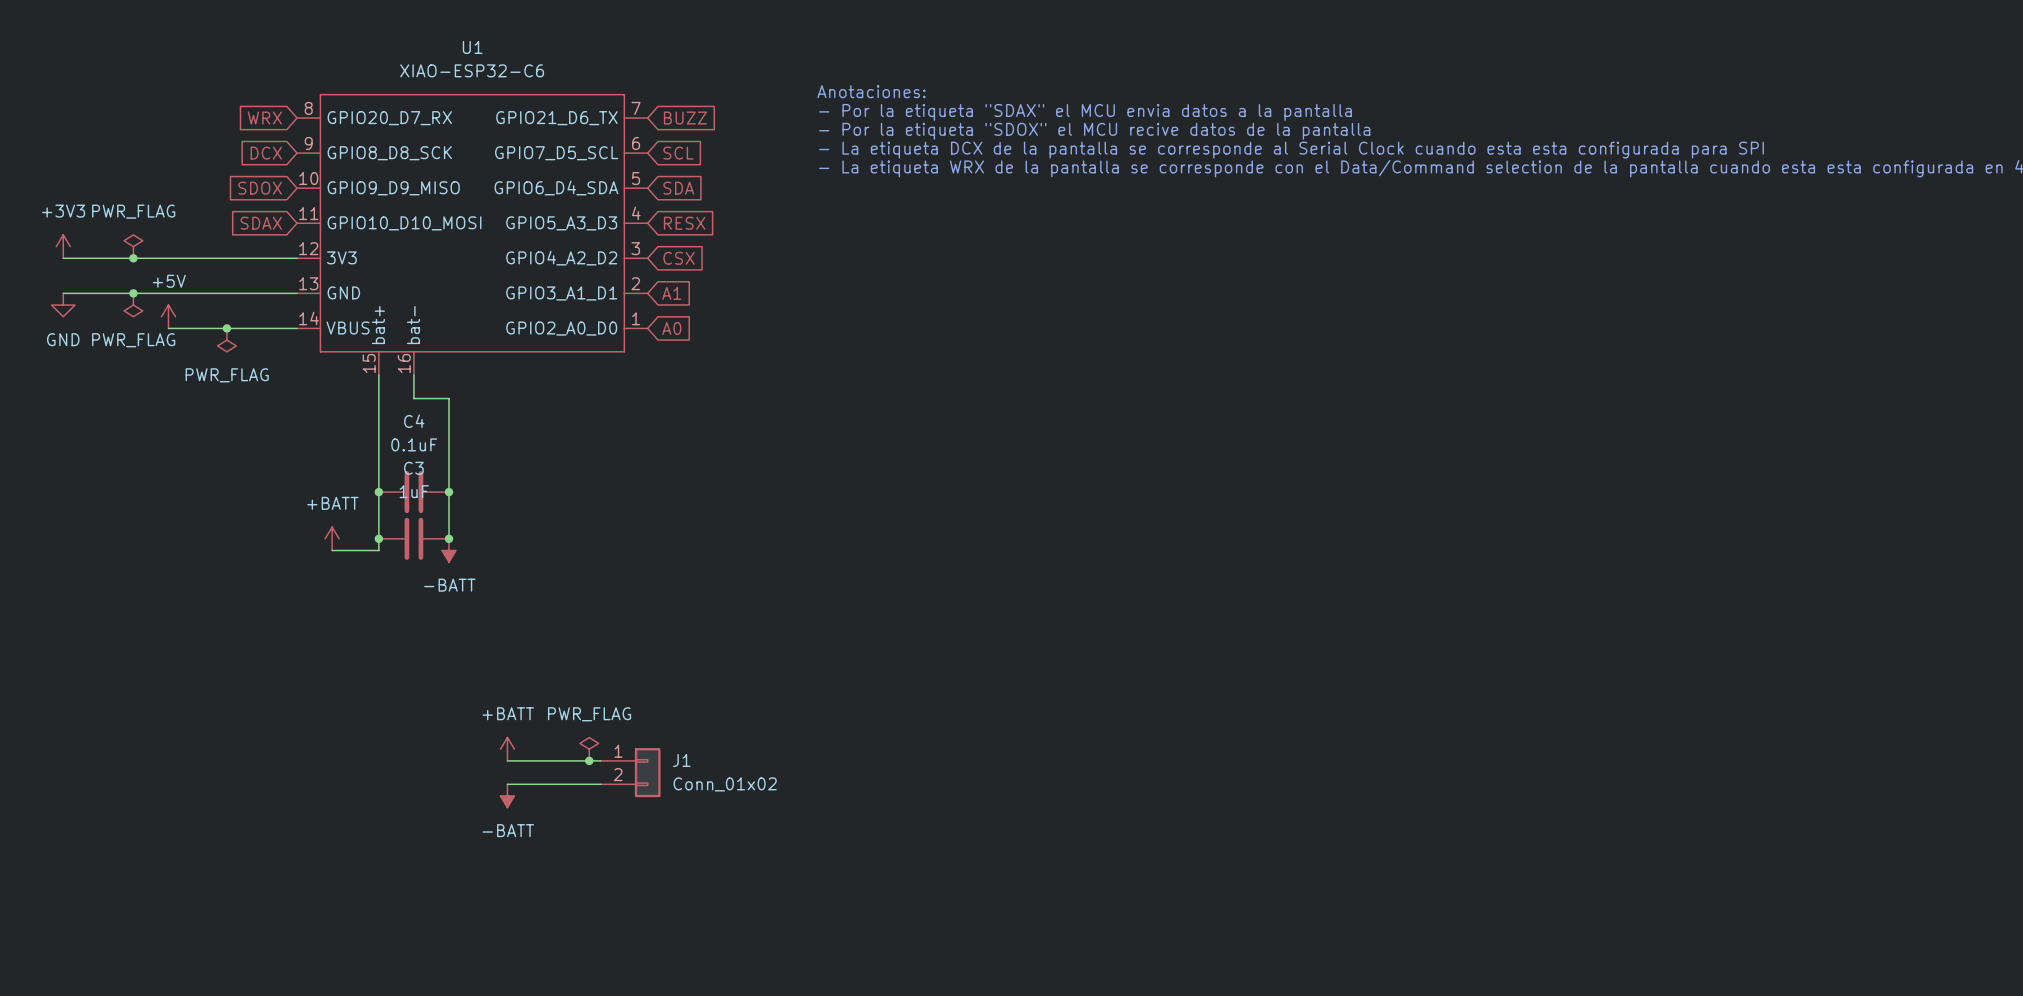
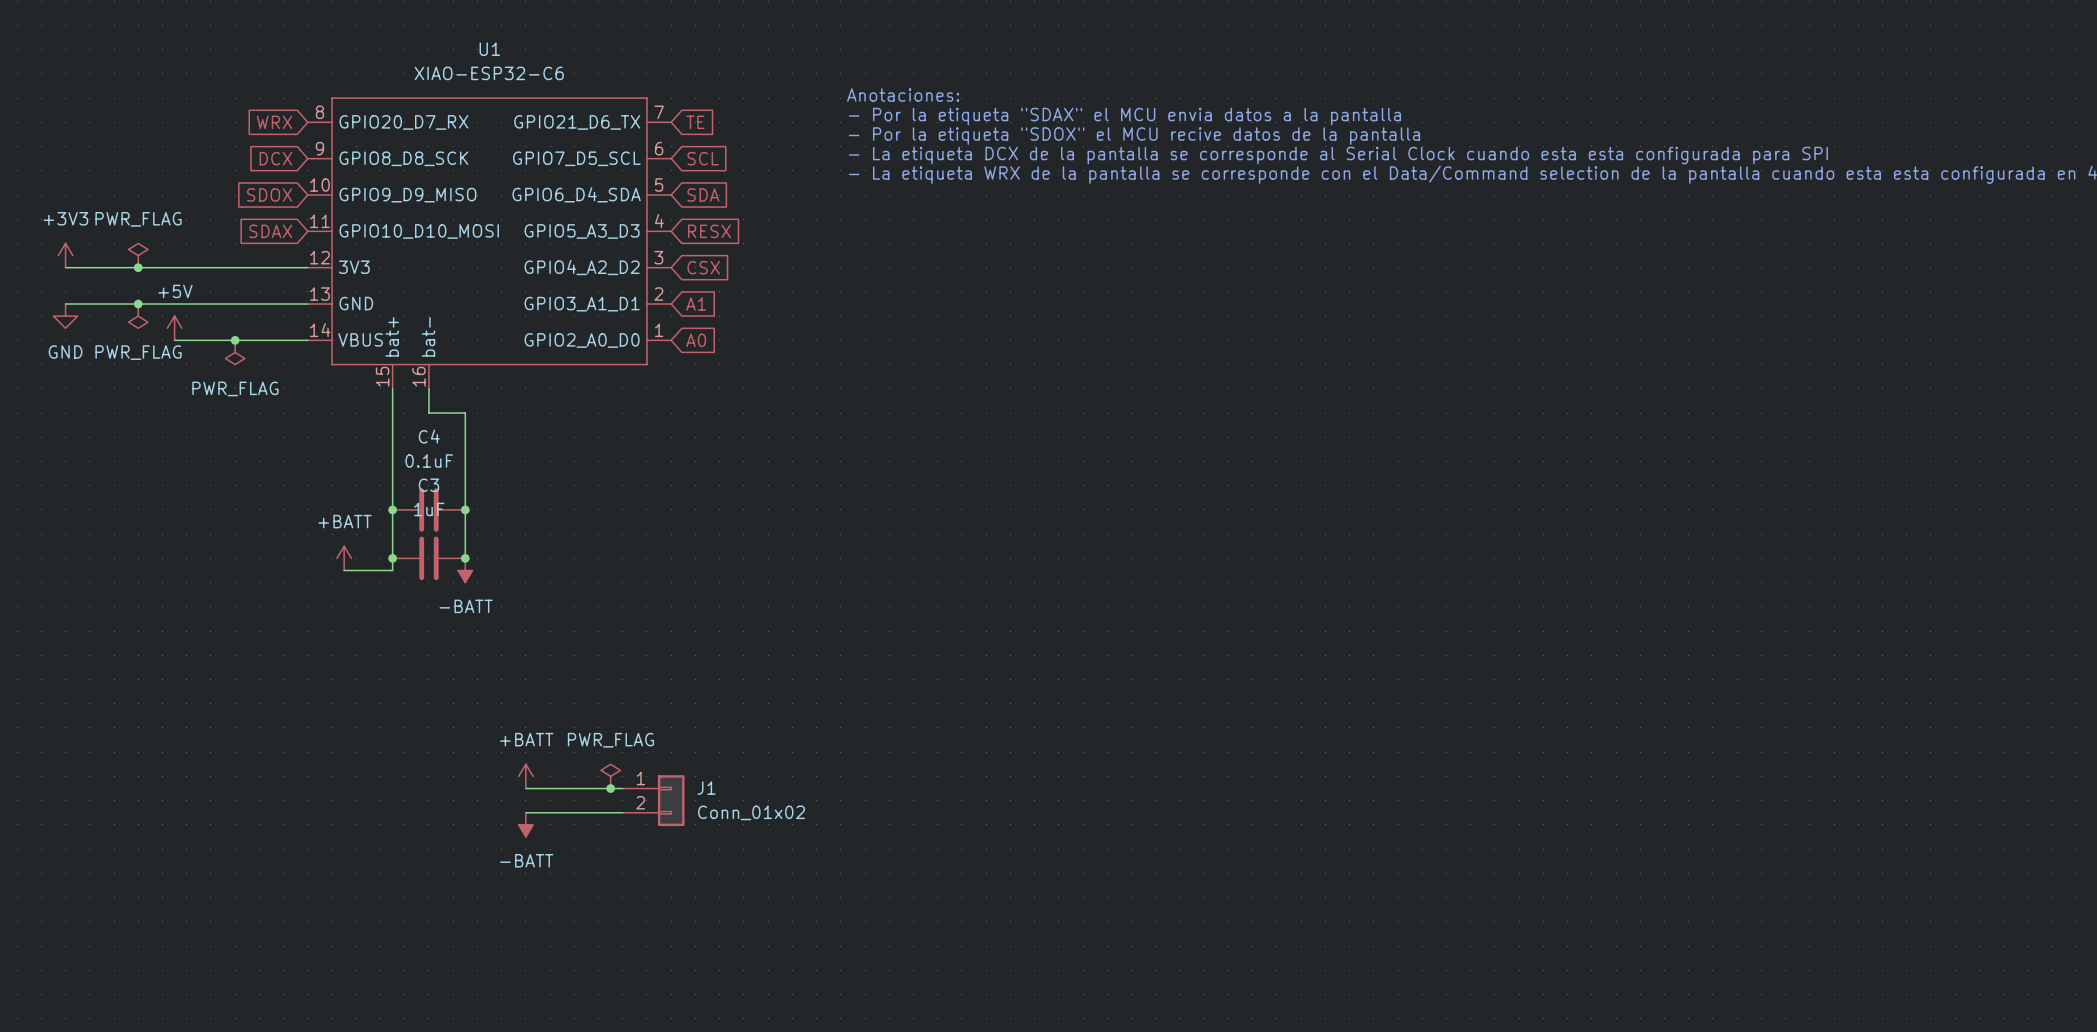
global label: BUZZ (685, 118) -> TE (695, 122)

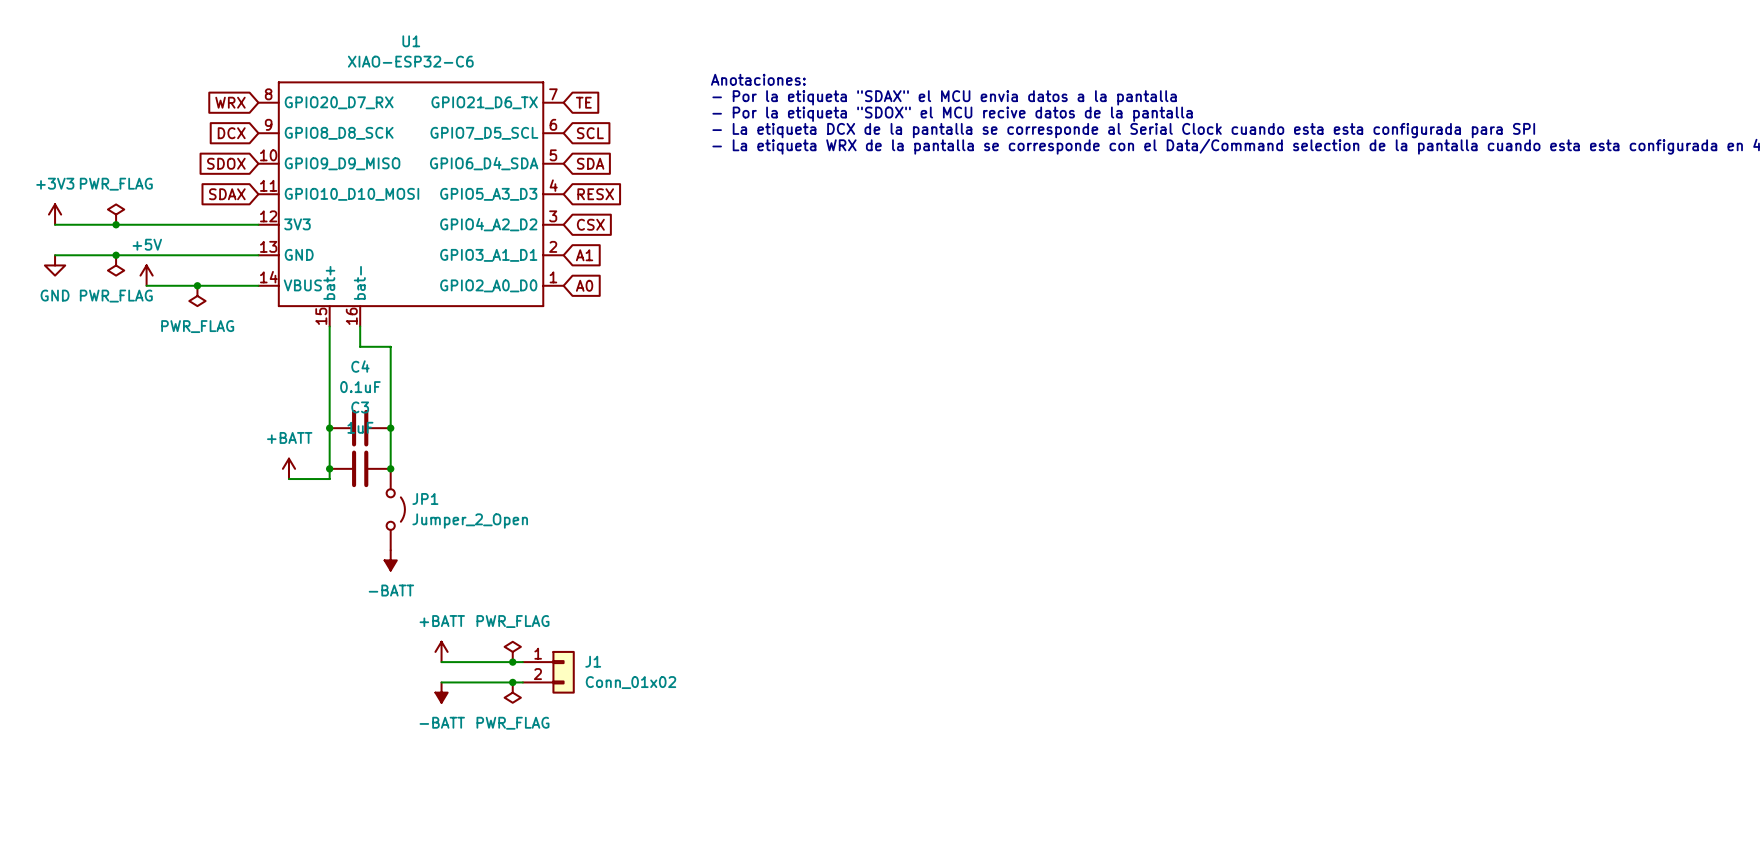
power symbol position: -BATT (465, 570) -> -BATT (390, 560)
JP1: none -> Jumper_2_Open (395, 509)
junction: none -> (512, 682)
power symbol: none -> PWR_FLAG (512, 692)

